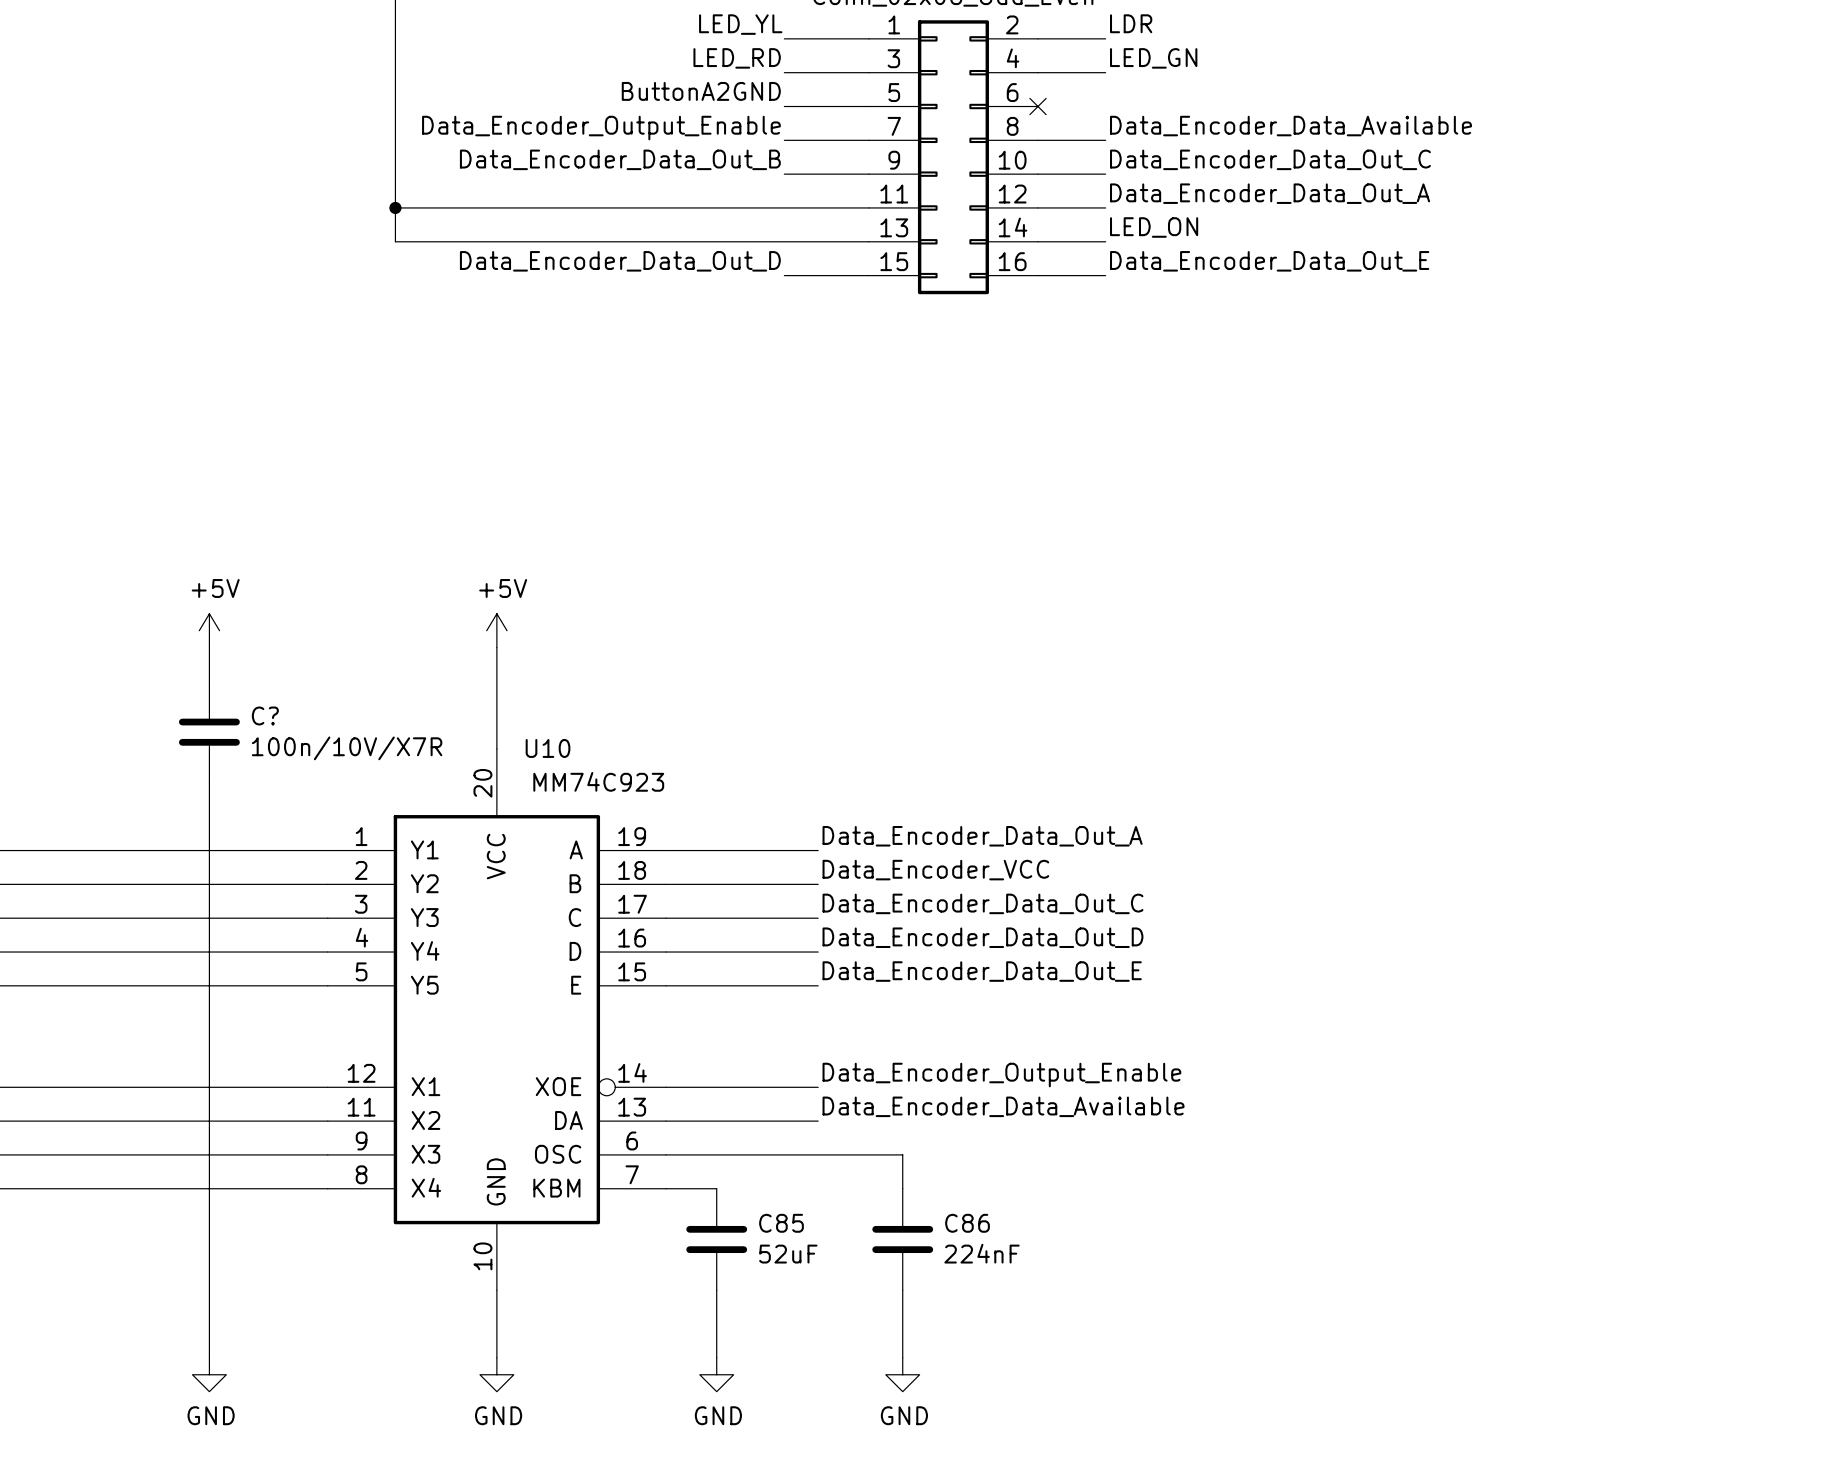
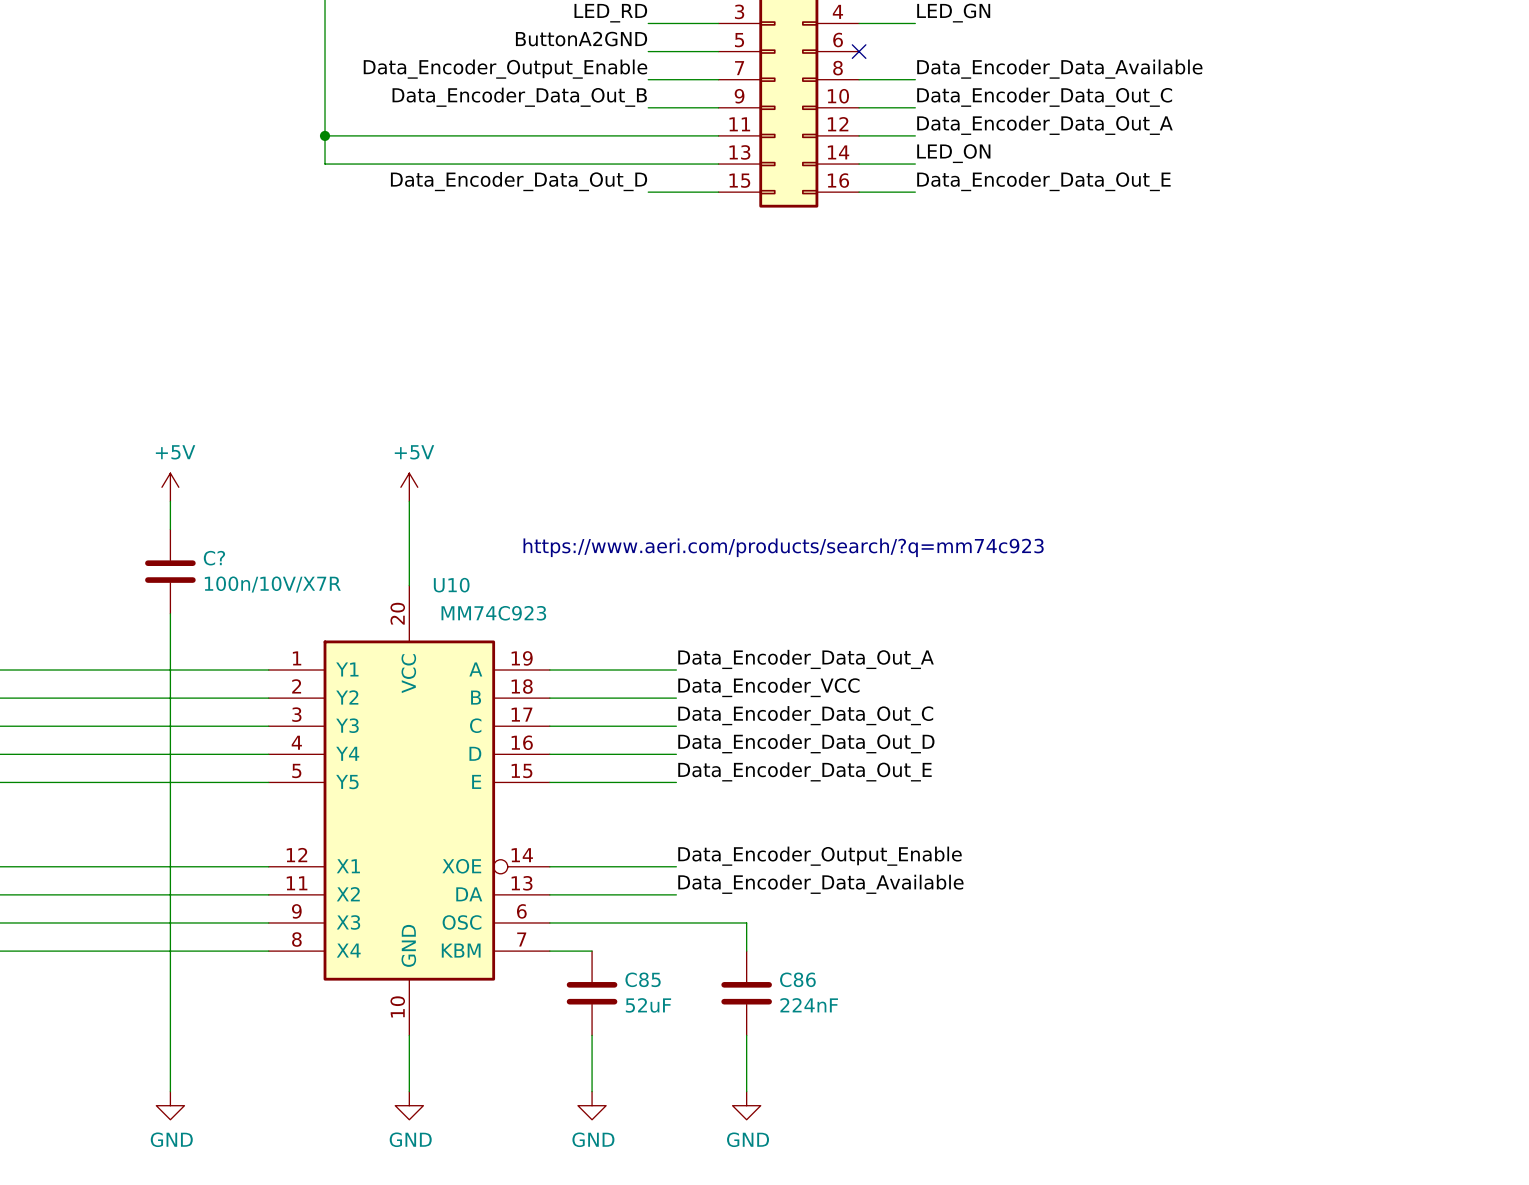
text: none -> https://www.aeri.com/products/search/?q=mm74c923 (783, 547)

